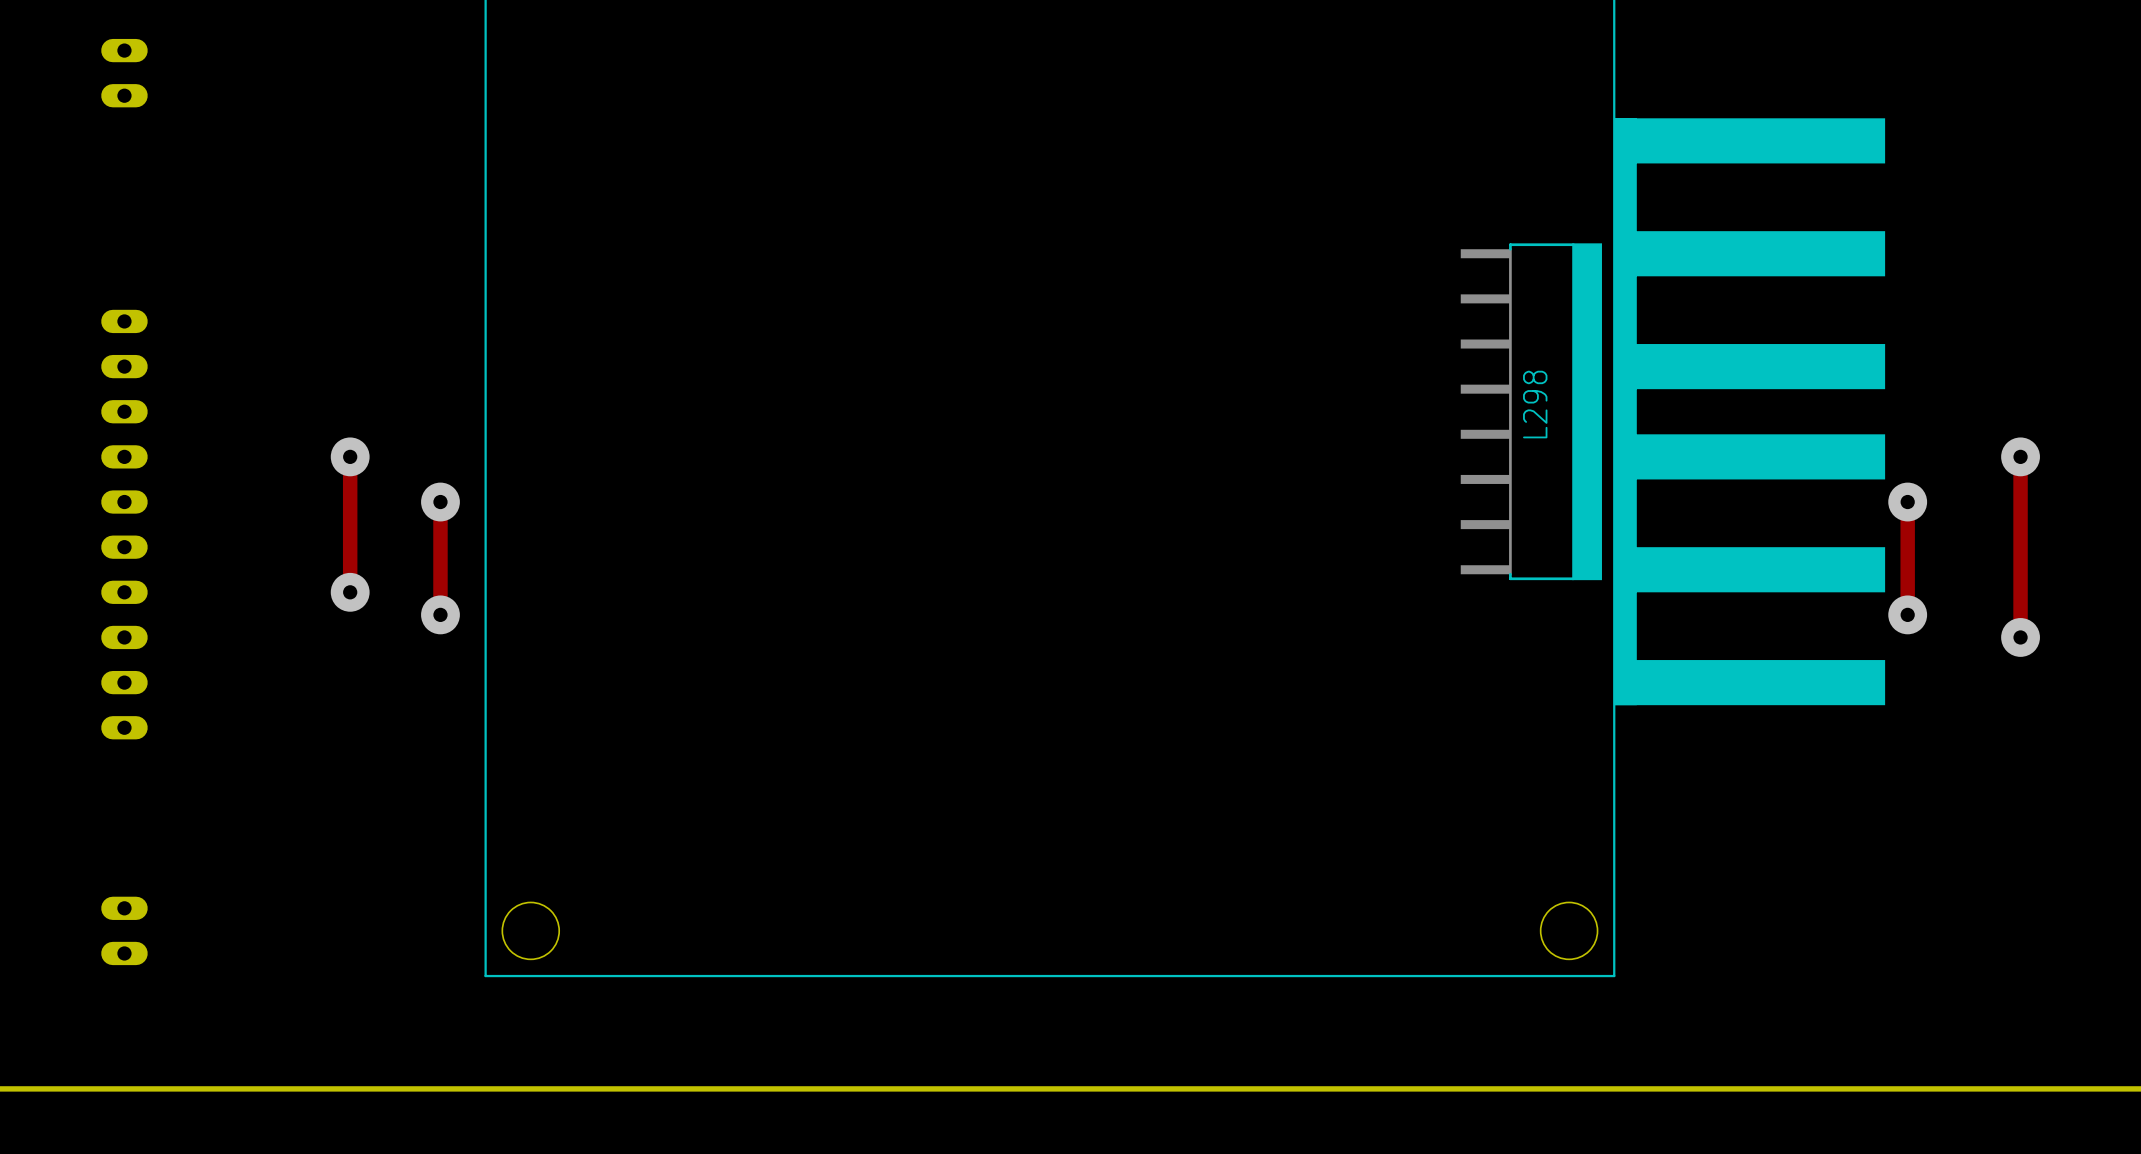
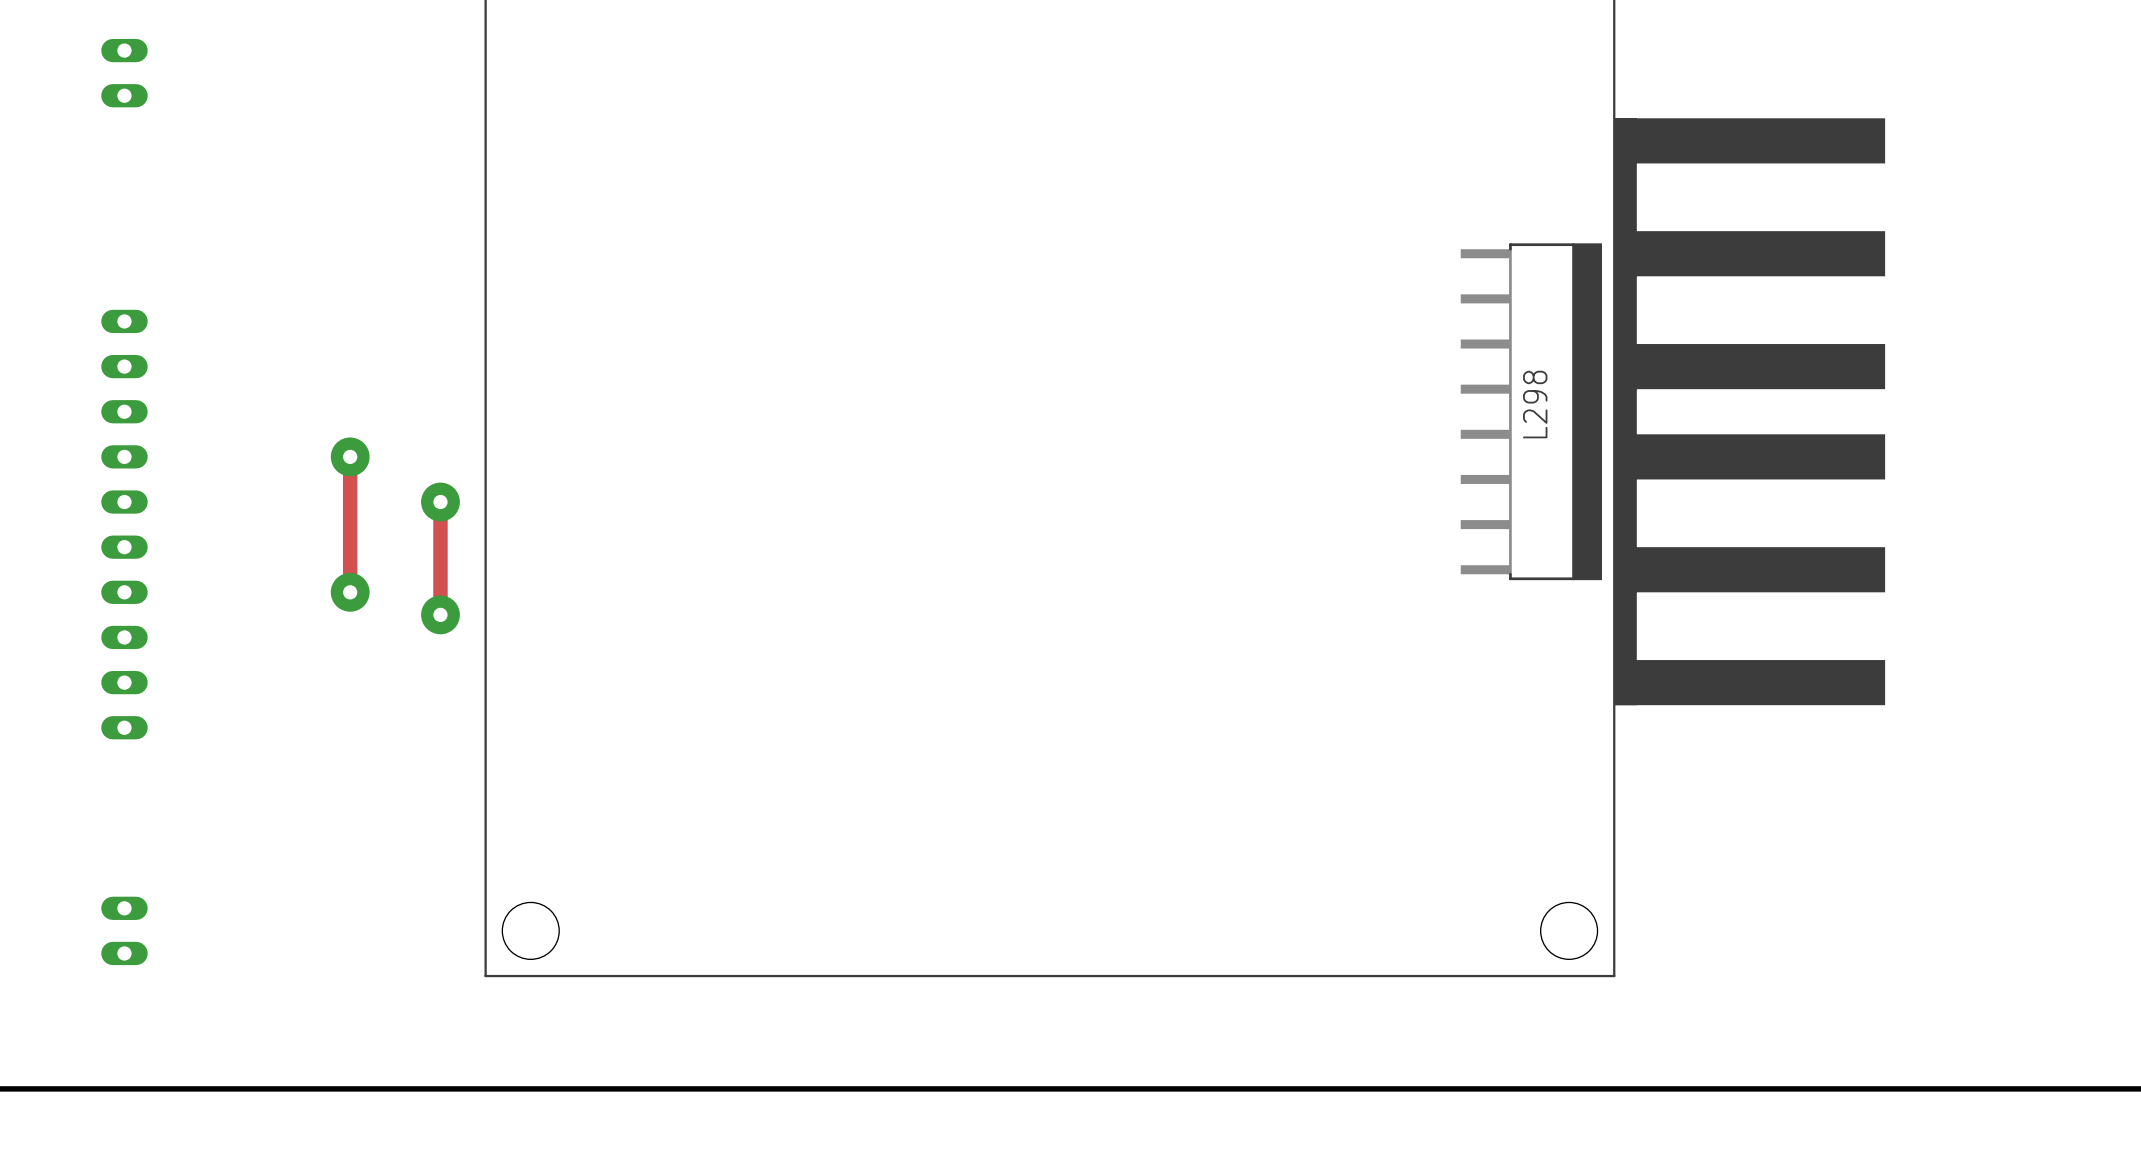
track: (2020, 456) (2020, 637) -> none
via: (2020, 456) -> none
track: (1907, 502) (1907, 614) -> none
via: (1907, 502) -> none
via: (1907, 614) -> none
via: (2020, 637) -> none

